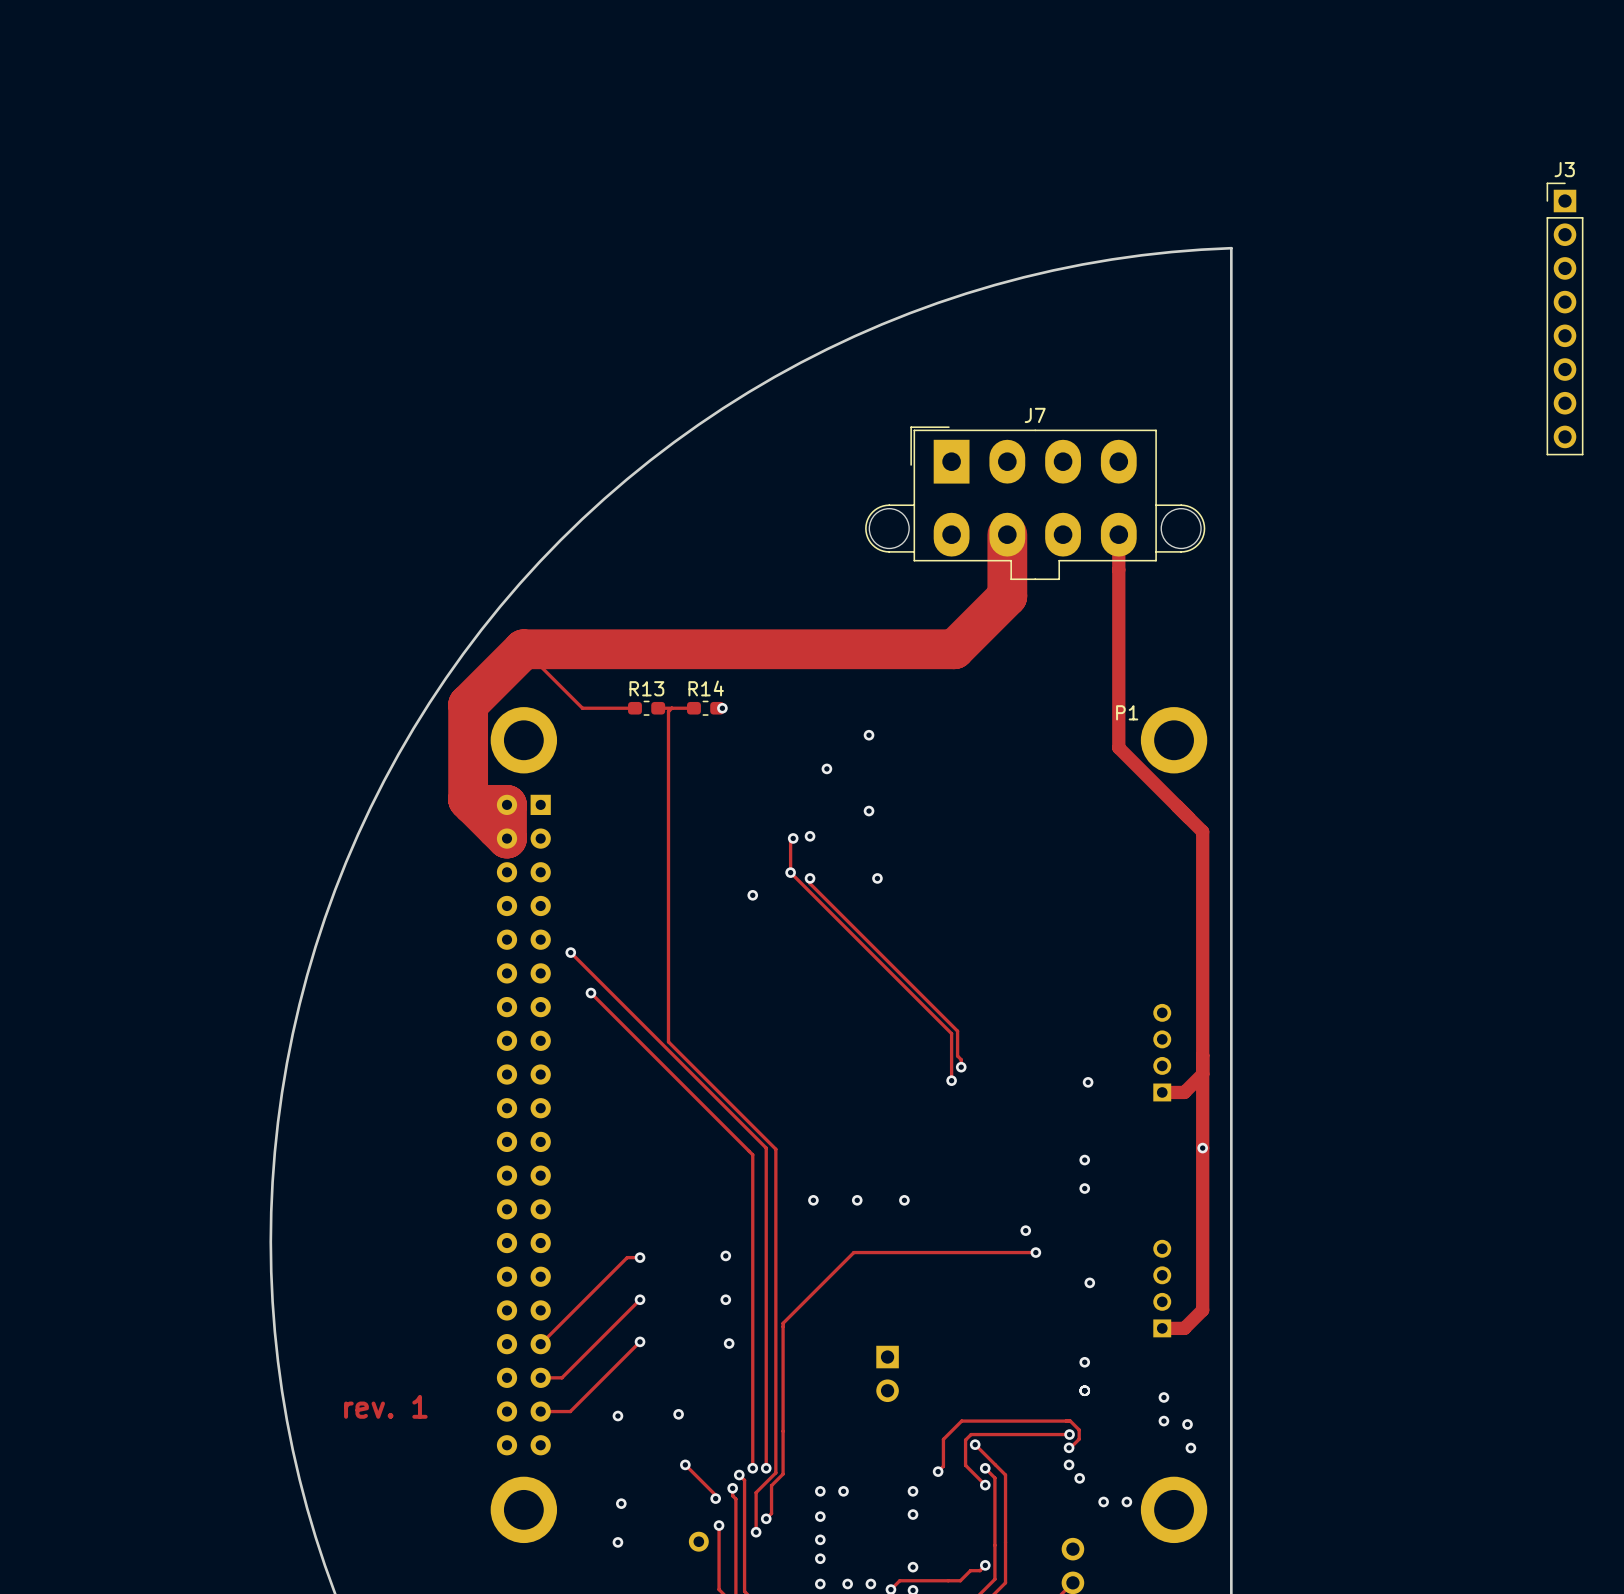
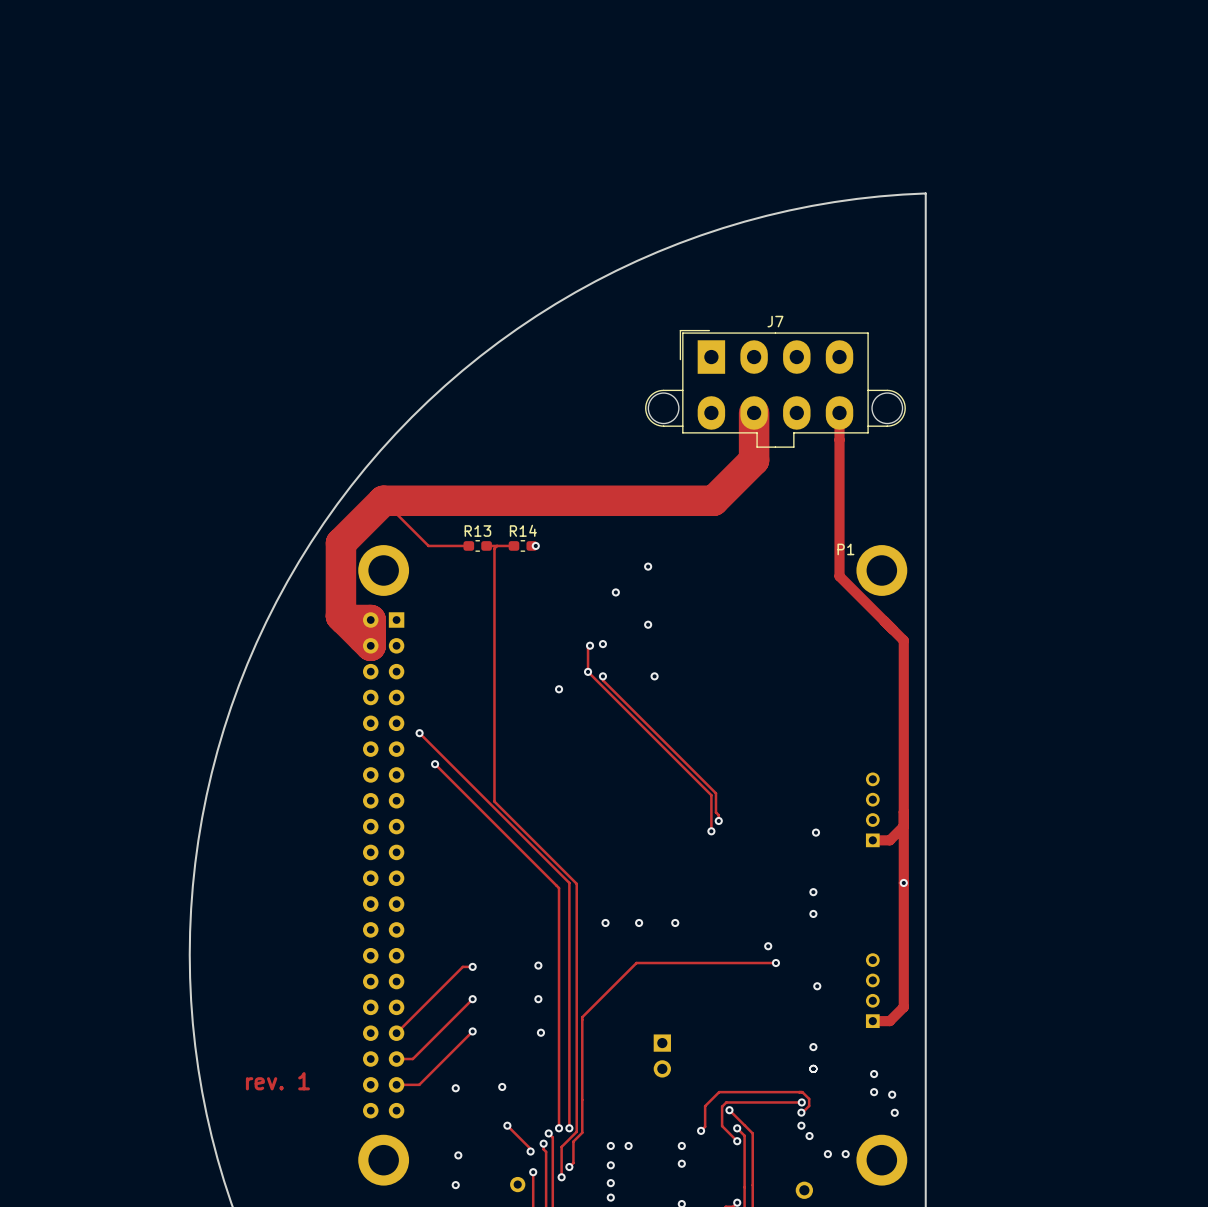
J3: (1565, 318) -> none

